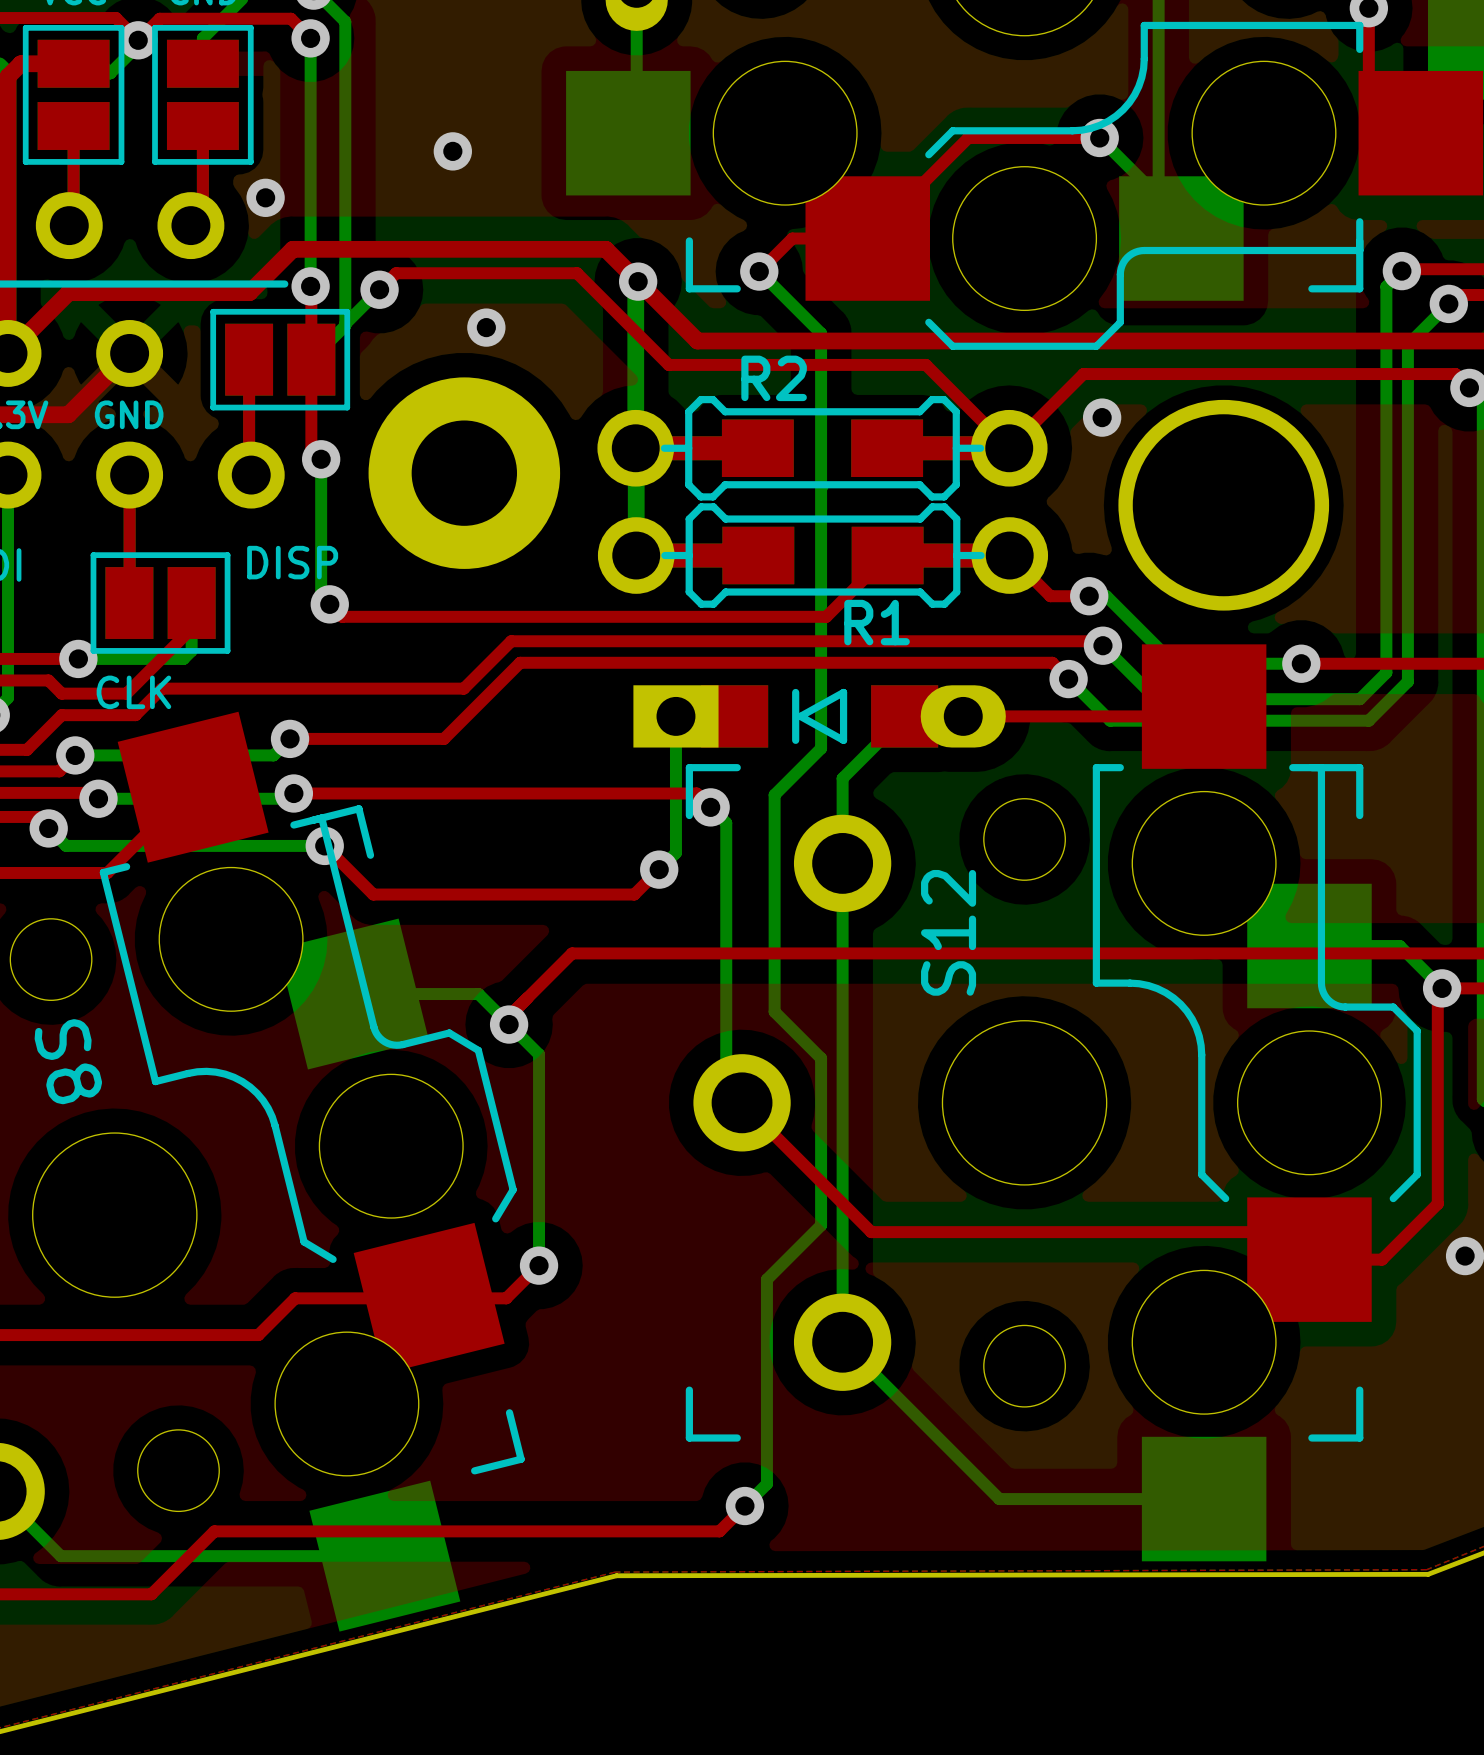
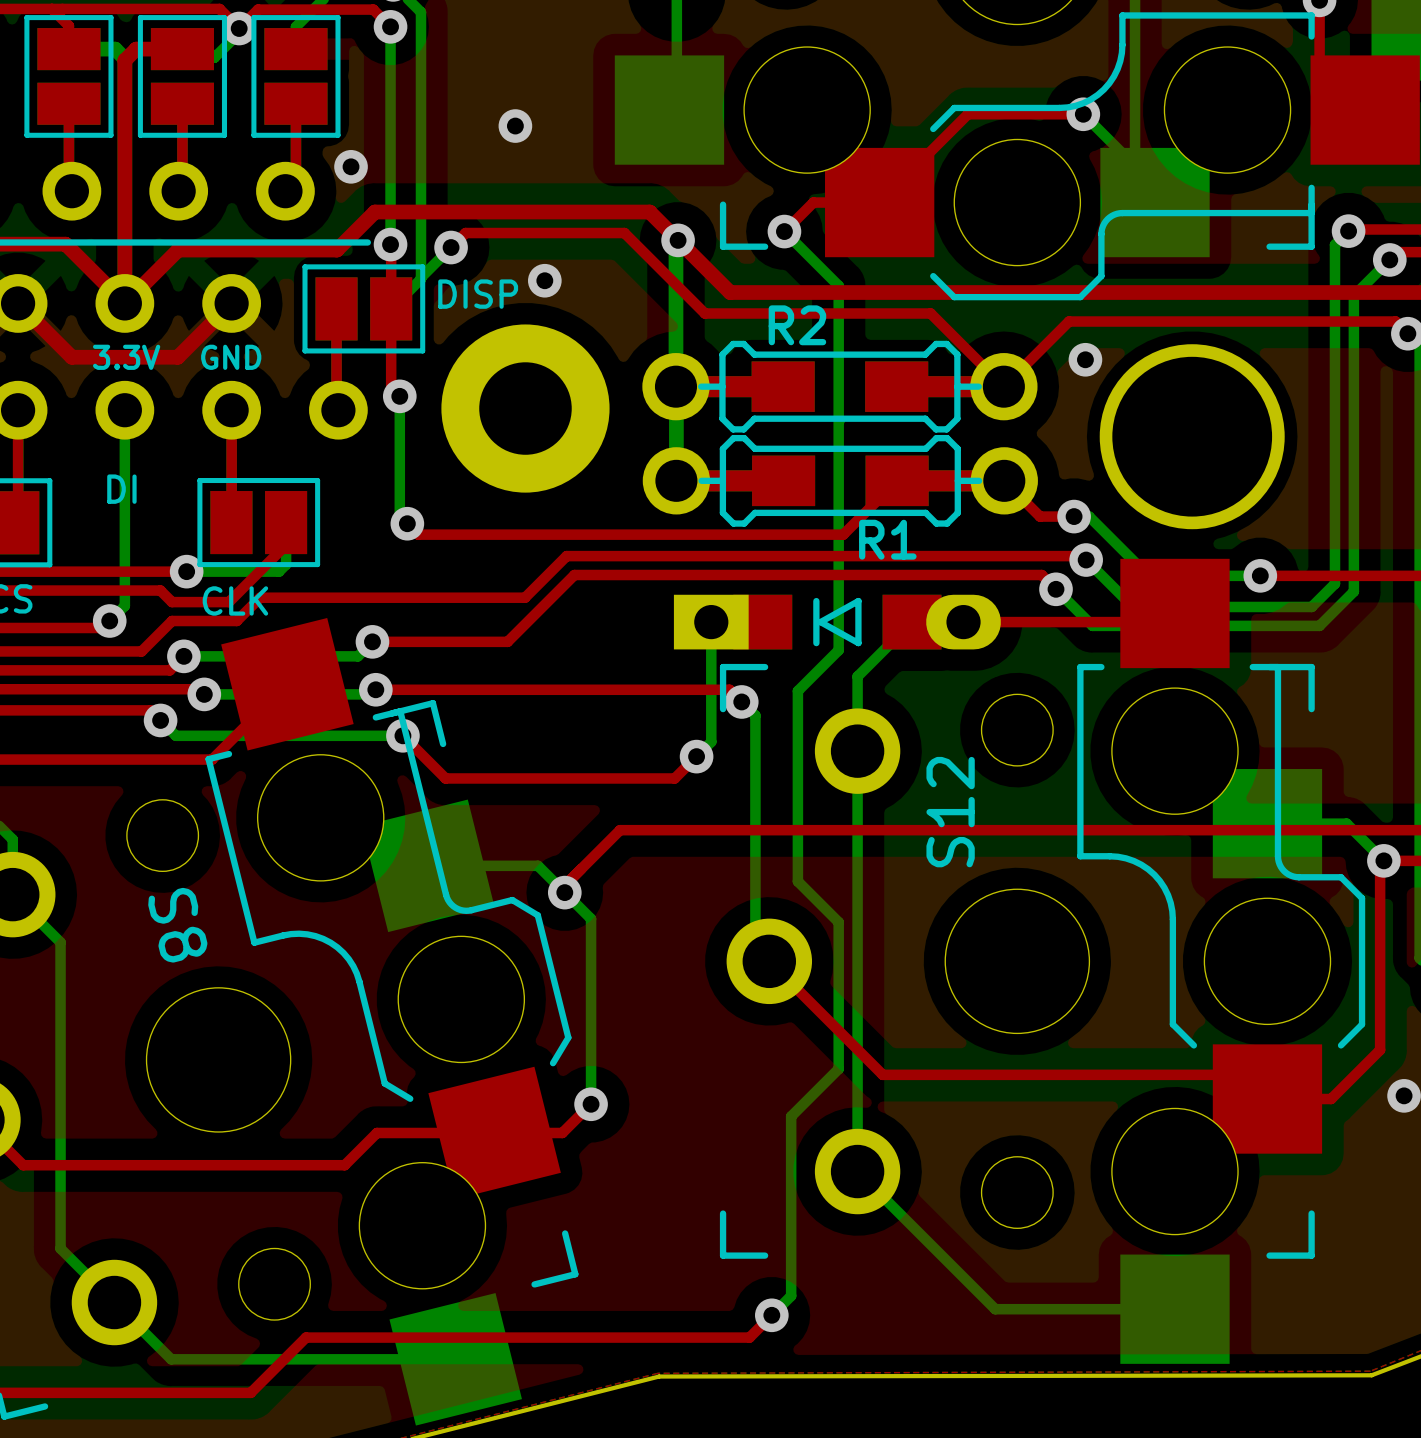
part text position: DISP (292, 562) -> DISP (478, 294)

